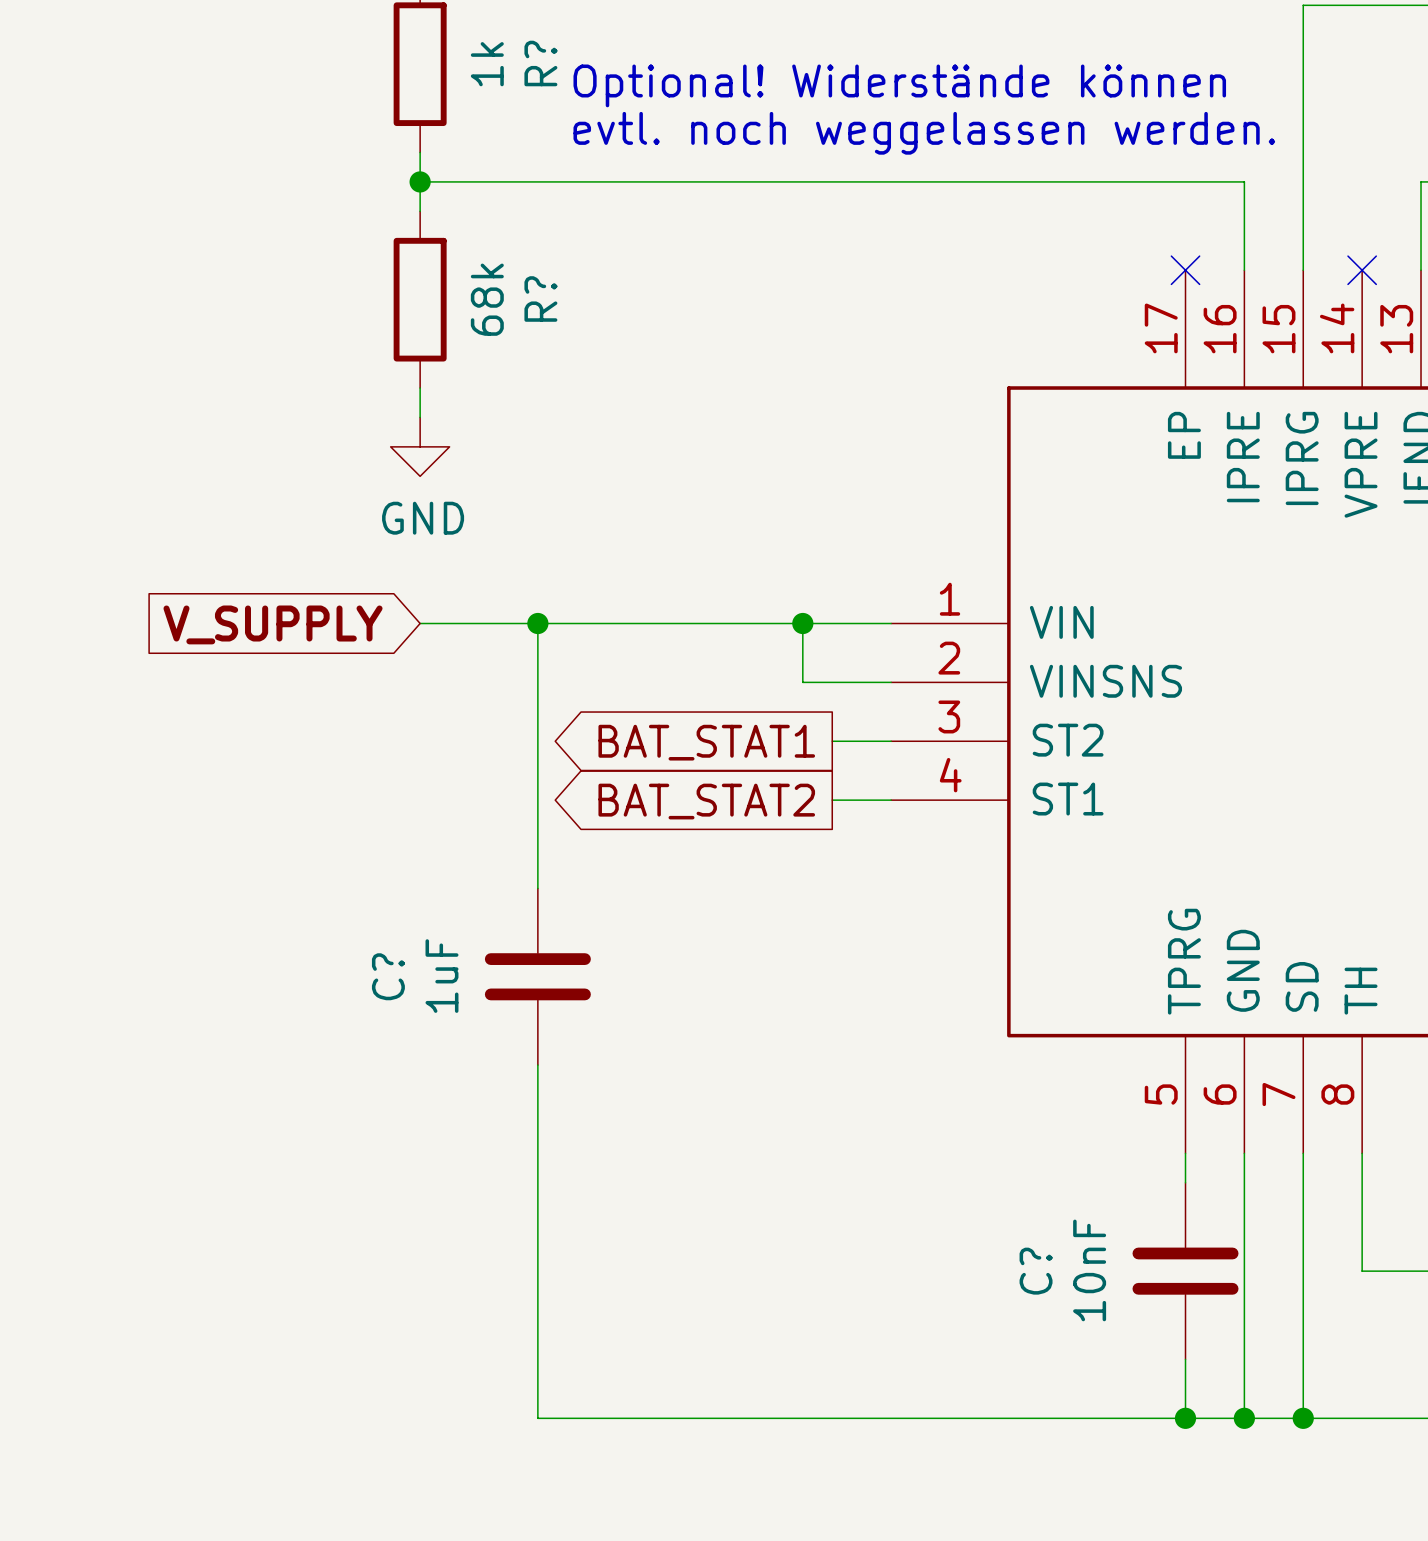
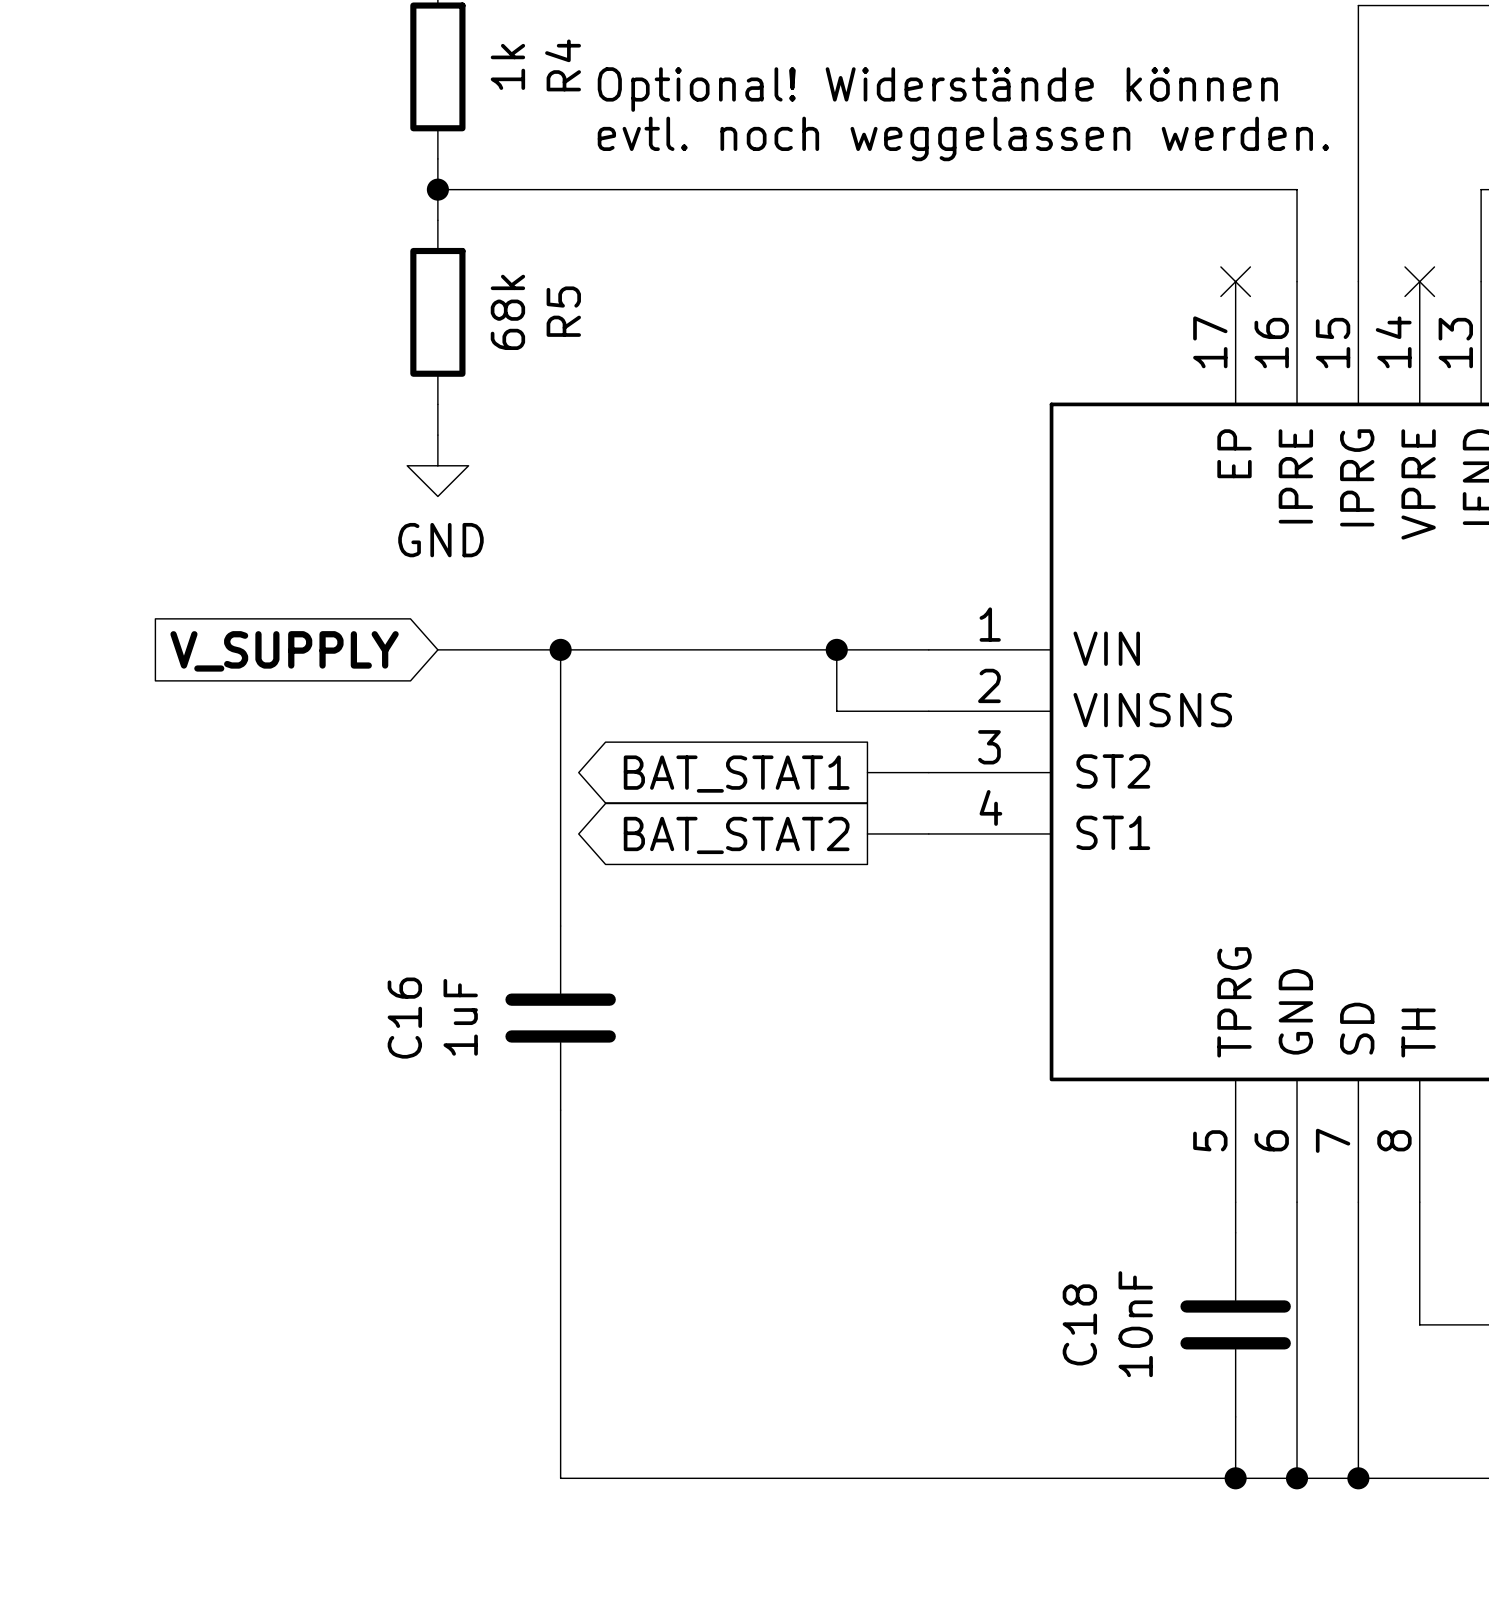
R? name: R? (540, 63) -> R4 (563, 65)
R? name: R? (540, 298) -> R5 (563, 311)
C? name: C? (388, 976) -> C16 (404, 1018)
C? name: C? (1036, 1271) -> C18 (1079, 1324)

